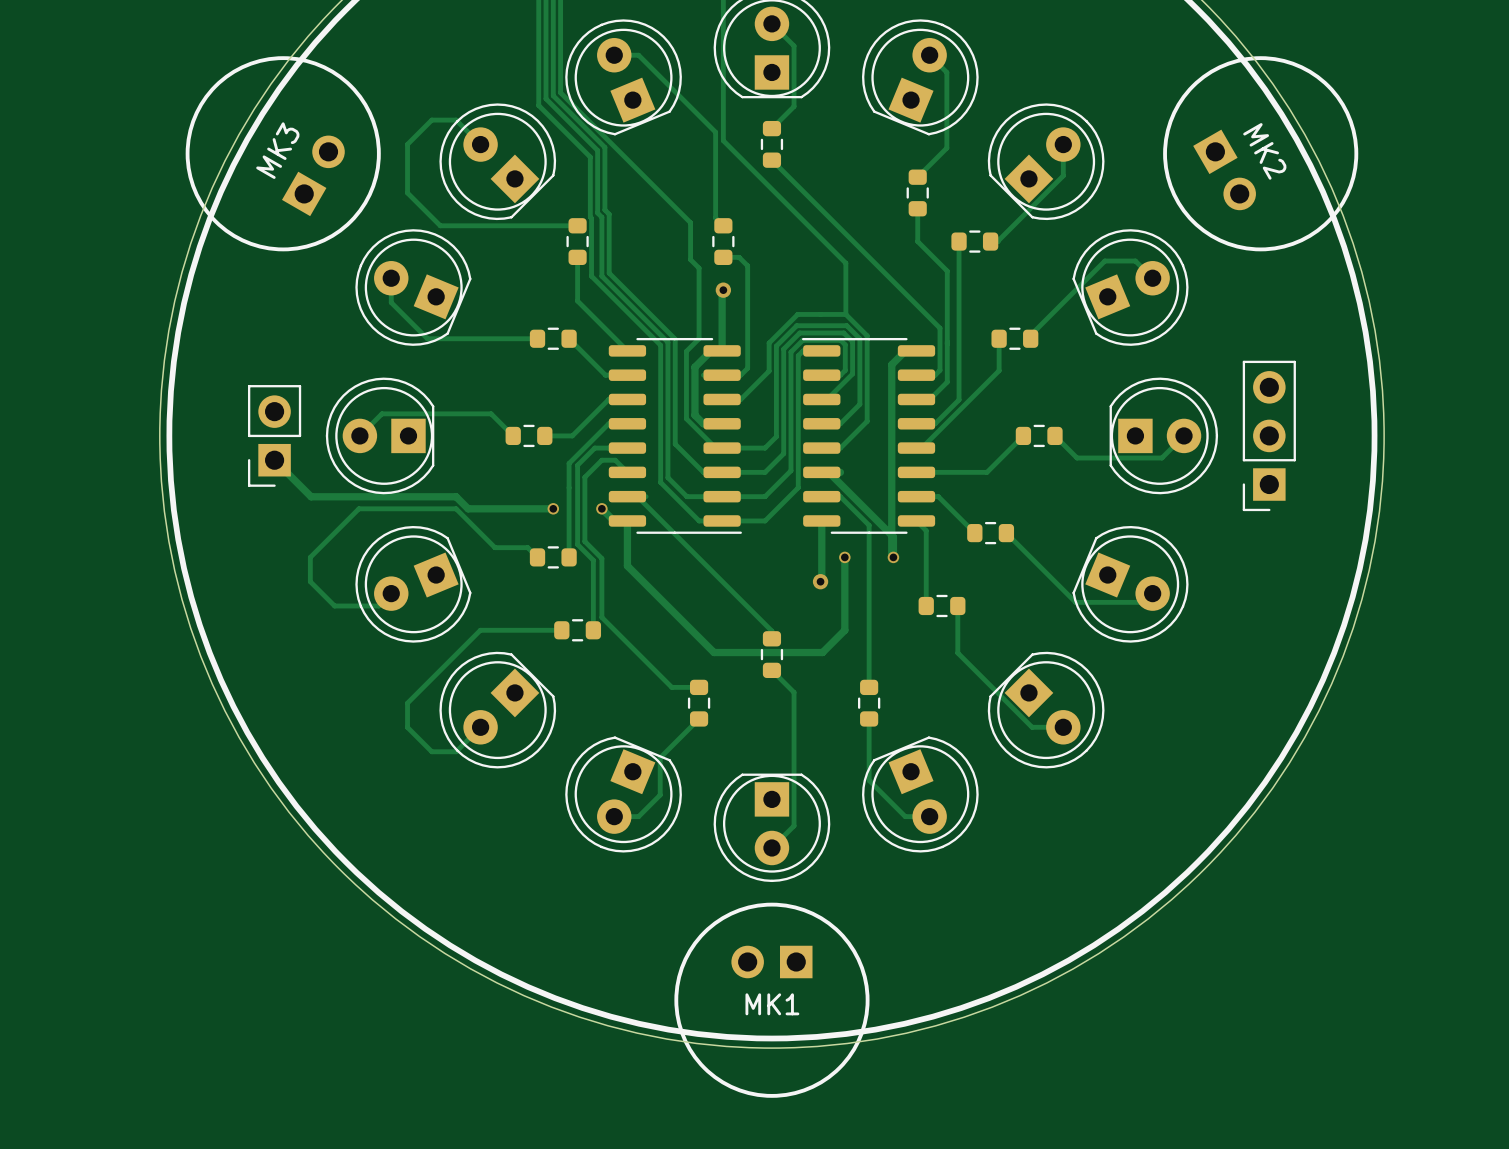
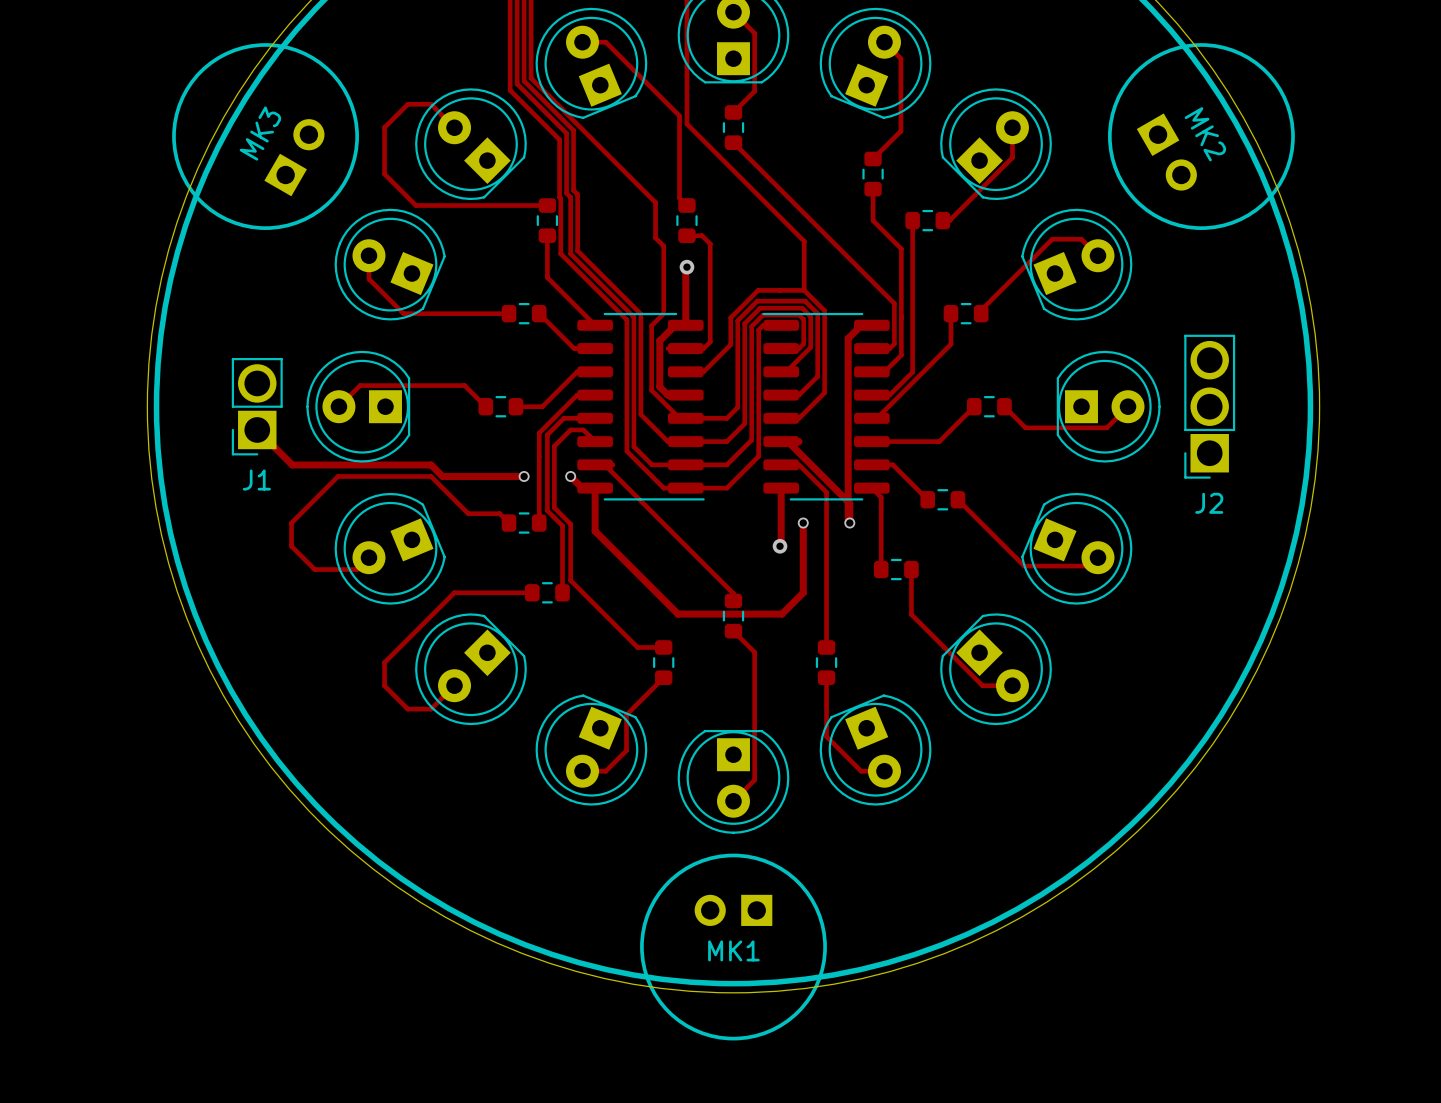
part: (274, 435) -> none
J1: none -> (257, 406)
part: (1269, 435) -> none
J2: none -> (1209, 406)

